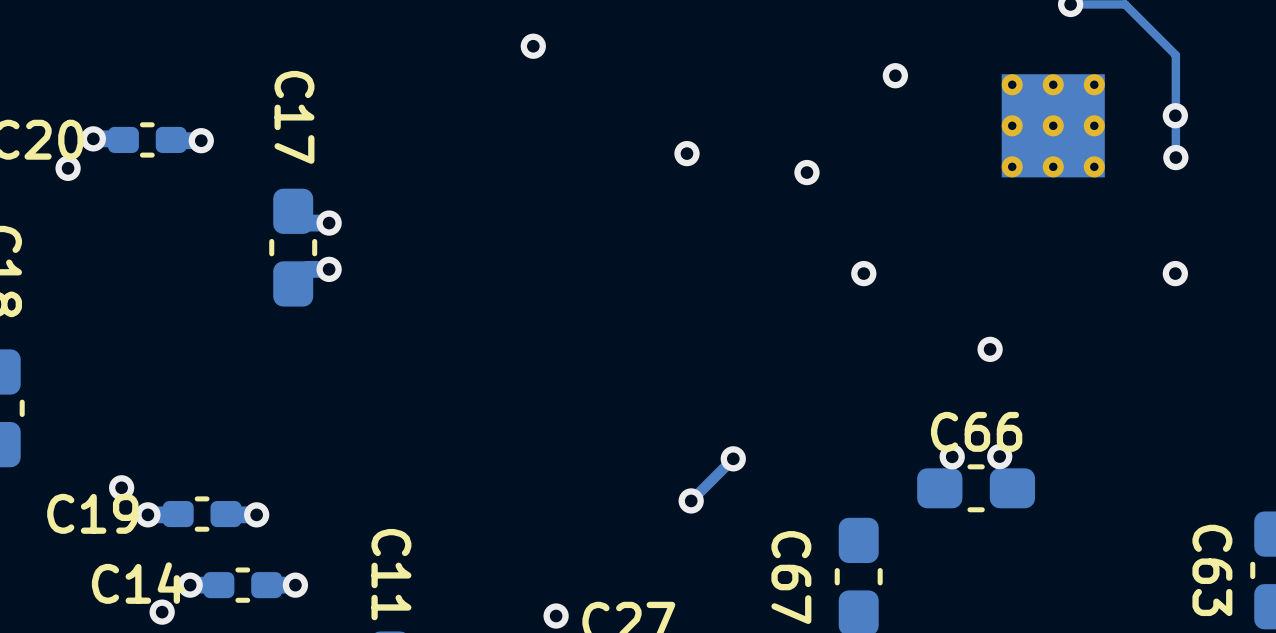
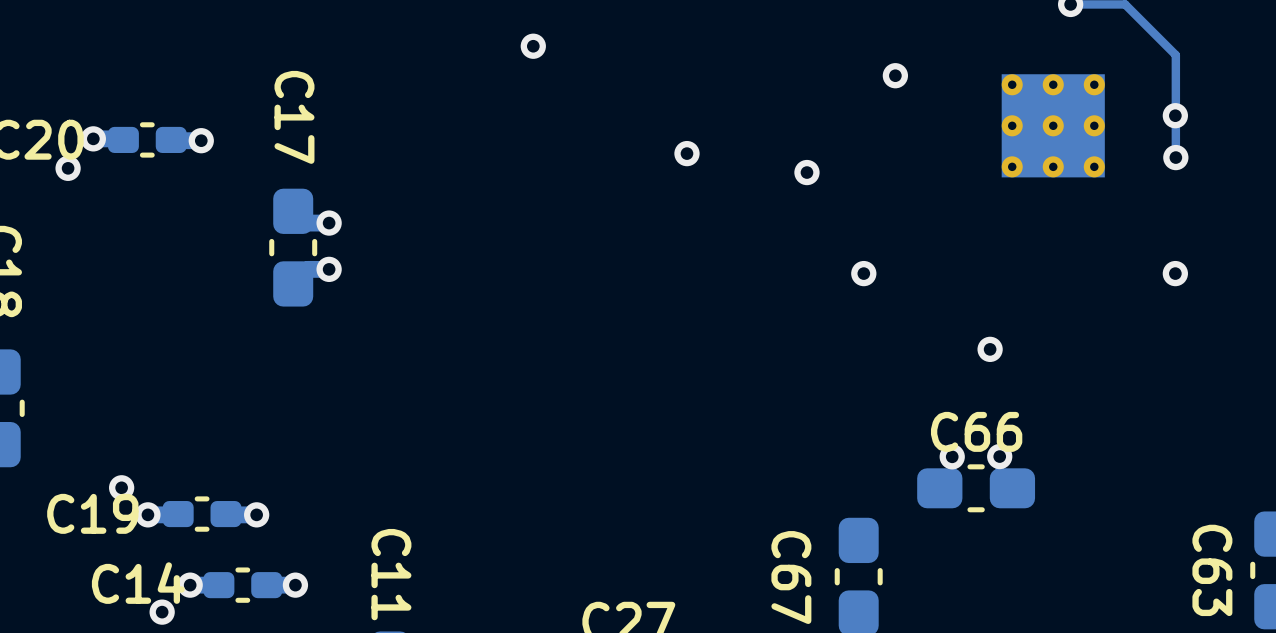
track: (733, 458) (691, 500) -> none
via: (733, 458) -> none
via: (691, 500) -> none
via: (556, 616) -> none

